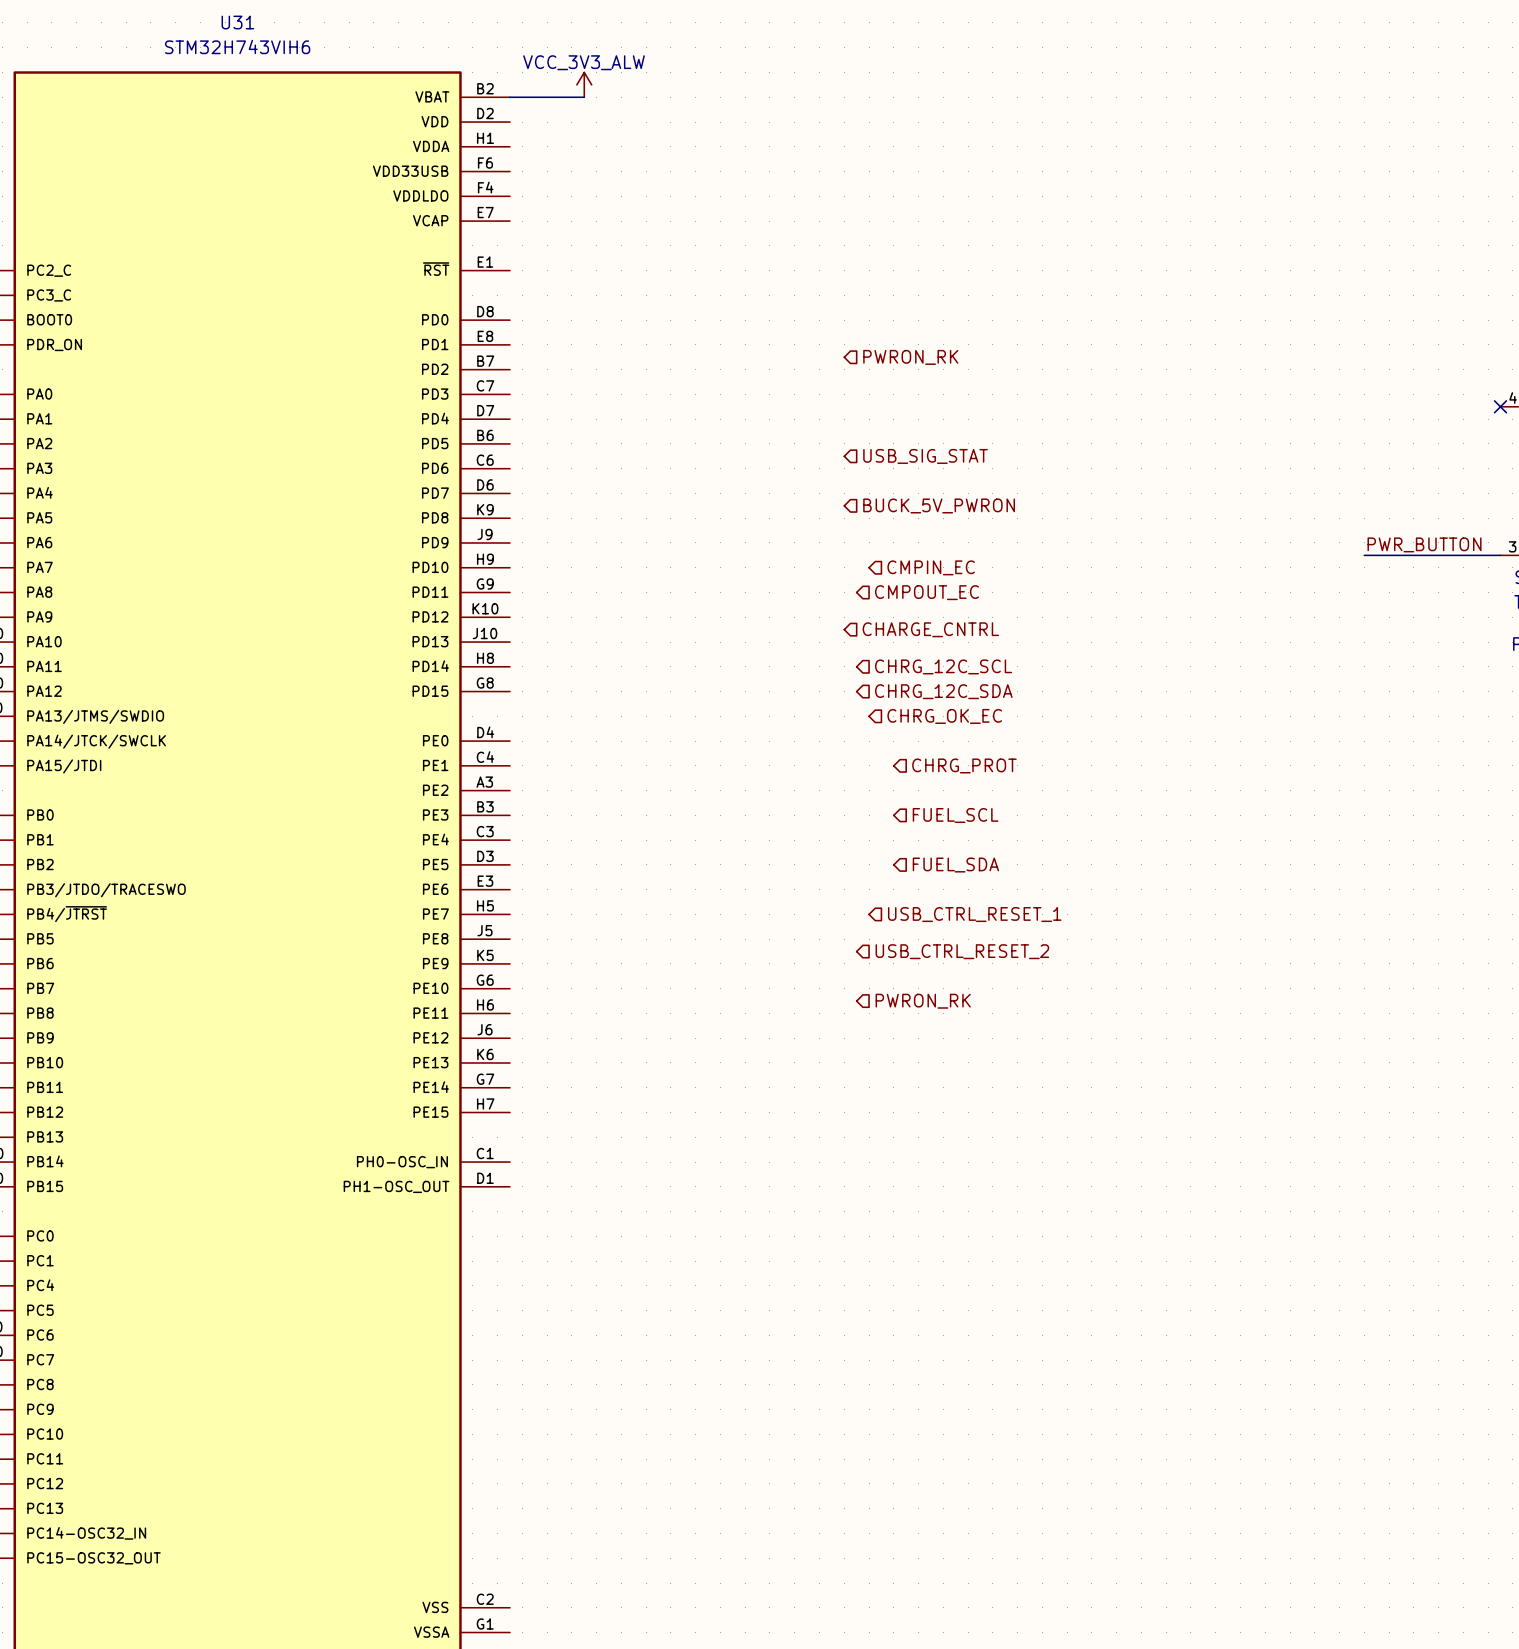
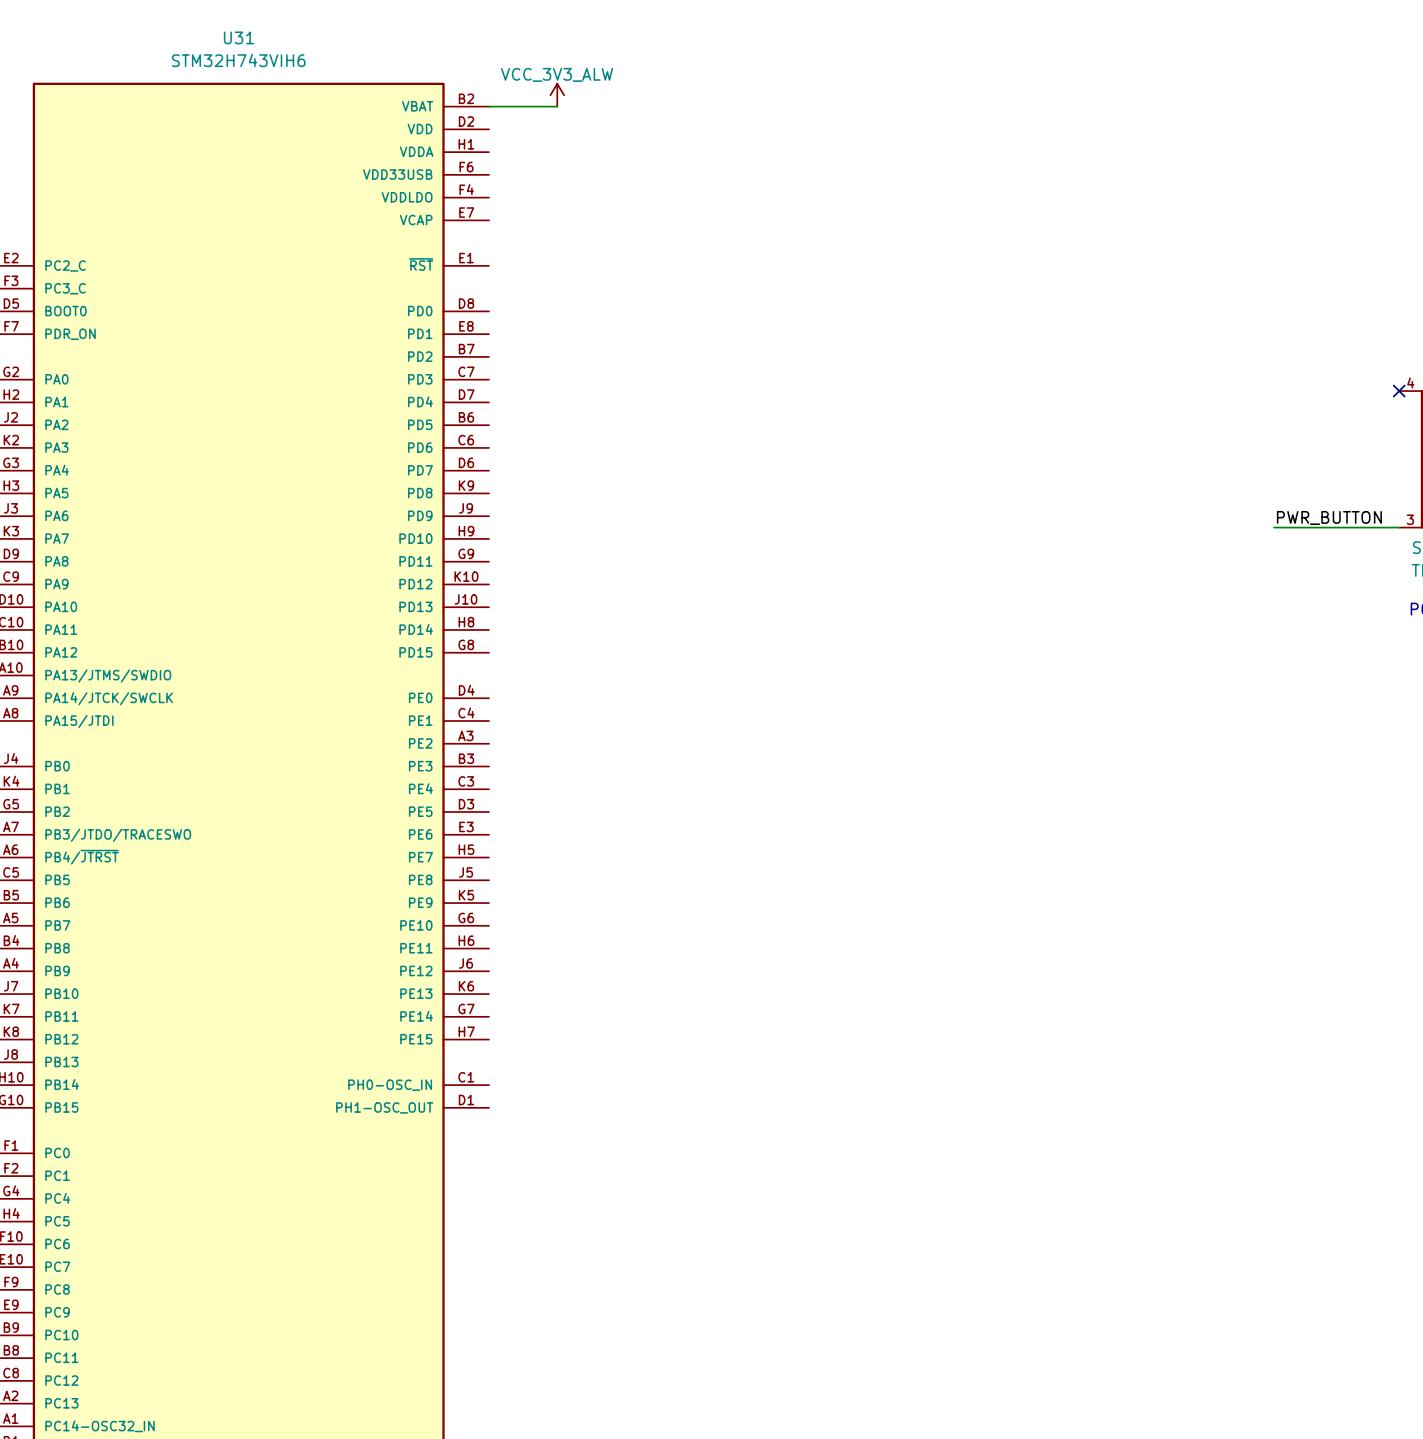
hierarchical label: PWRON_RK (910, 357) -> none
hierarchical label: USB_SIG_STAT (925, 456) -> none
hierarchical label: BUCK_5V_PWRON (939, 505) -> none
hierarchical label: CMPIN_EC (931, 567) -> none
hierarchical label: CMPOUT_EC (927, 592) -> none
hierarchical label: CHARGE_CNTRL (930, 629) -> none
hierarchical label: CHRG_12C_SCL (943, 666) -> none
hierarchical label: CHRG_12C_SDA (943, 691) -> none
hierarchical label: CHRG_OK_EC (944, 716) -> none
hierarchical label: CHRG_PROT (964, 765) -> none
hierarchical label: FUEL_SCL (955, 815) -> none
hierarchical label: FUEL_SDA (955, 865) -> none
hierarchical label: USB_CTRL_RESET_1 (974, 914) -> none
hierarchical label: USB_CTRL_RESET_2 (962, 951) -> none
hierarchical label: PWRON_RK (923, 1001) -> none

